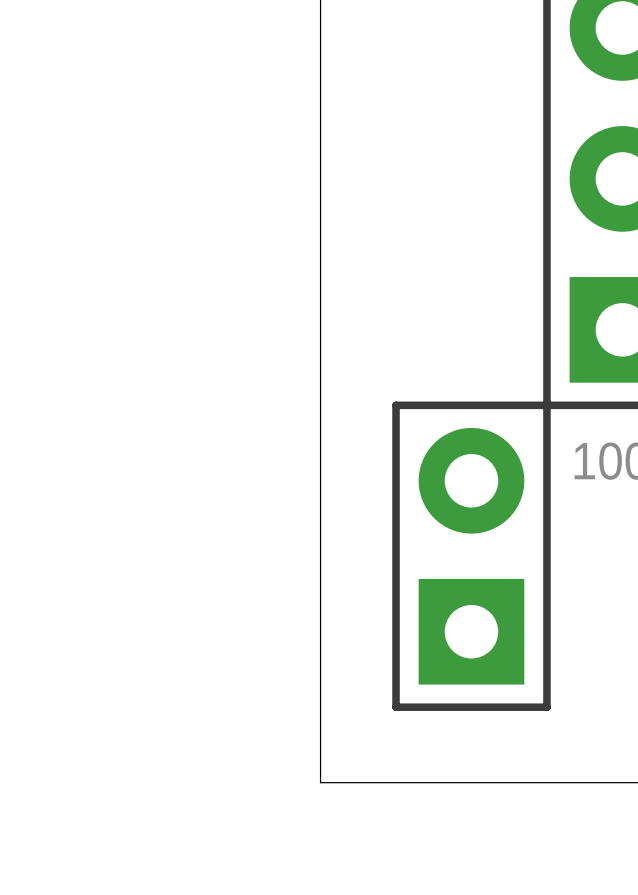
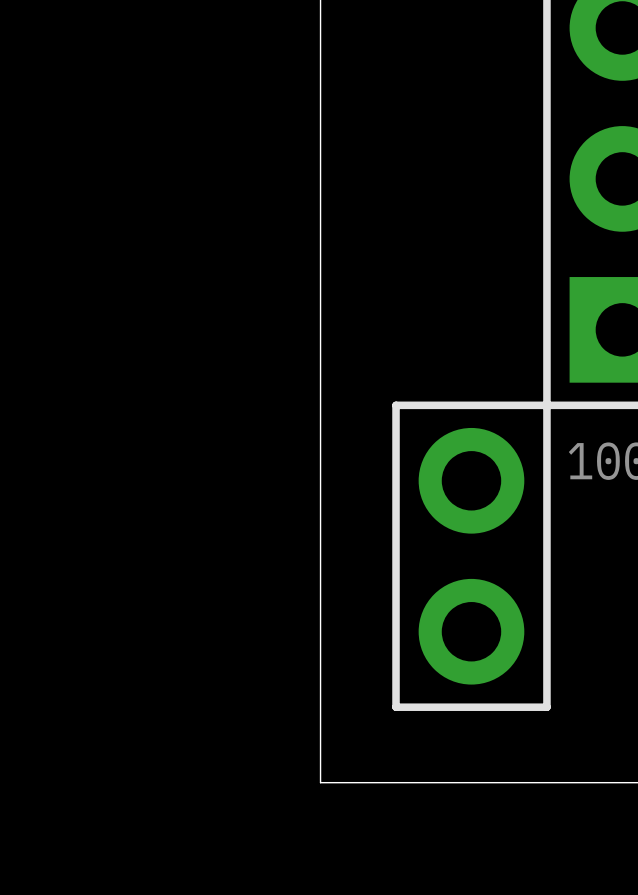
part footprint: [392, 401, 551, 711] -> [392, 401, 551, 711]

